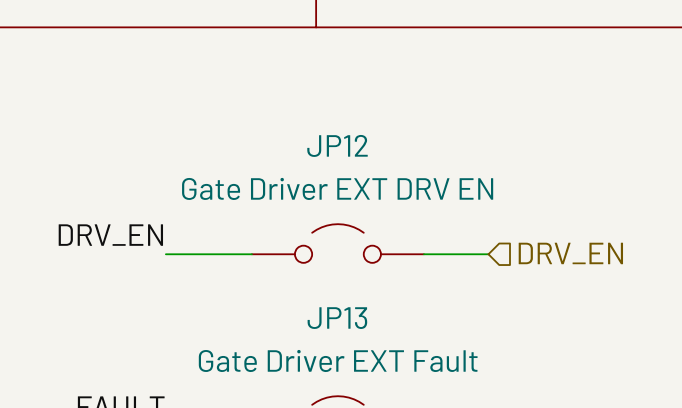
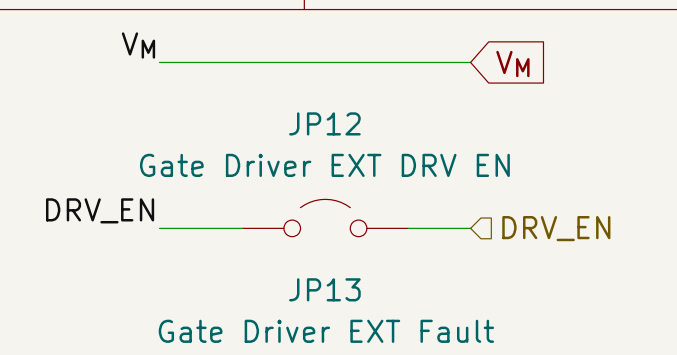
label: none -> VM (138, 45)
wire: none -> (159, 62) (470, 62)
global label: none -> VM (512, 64)

